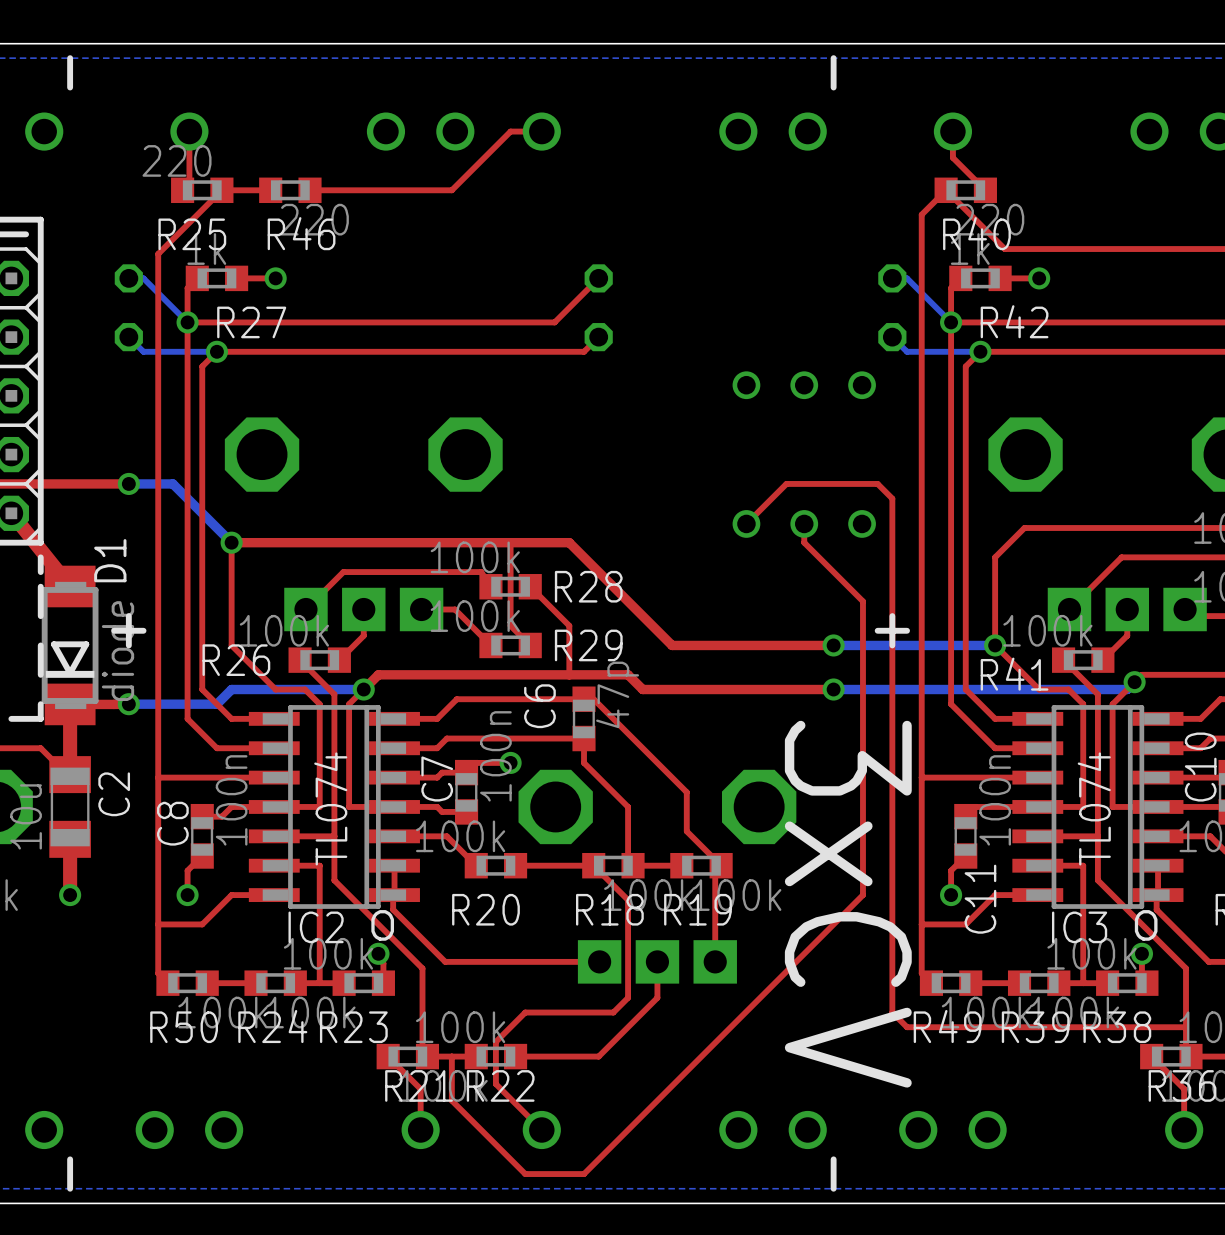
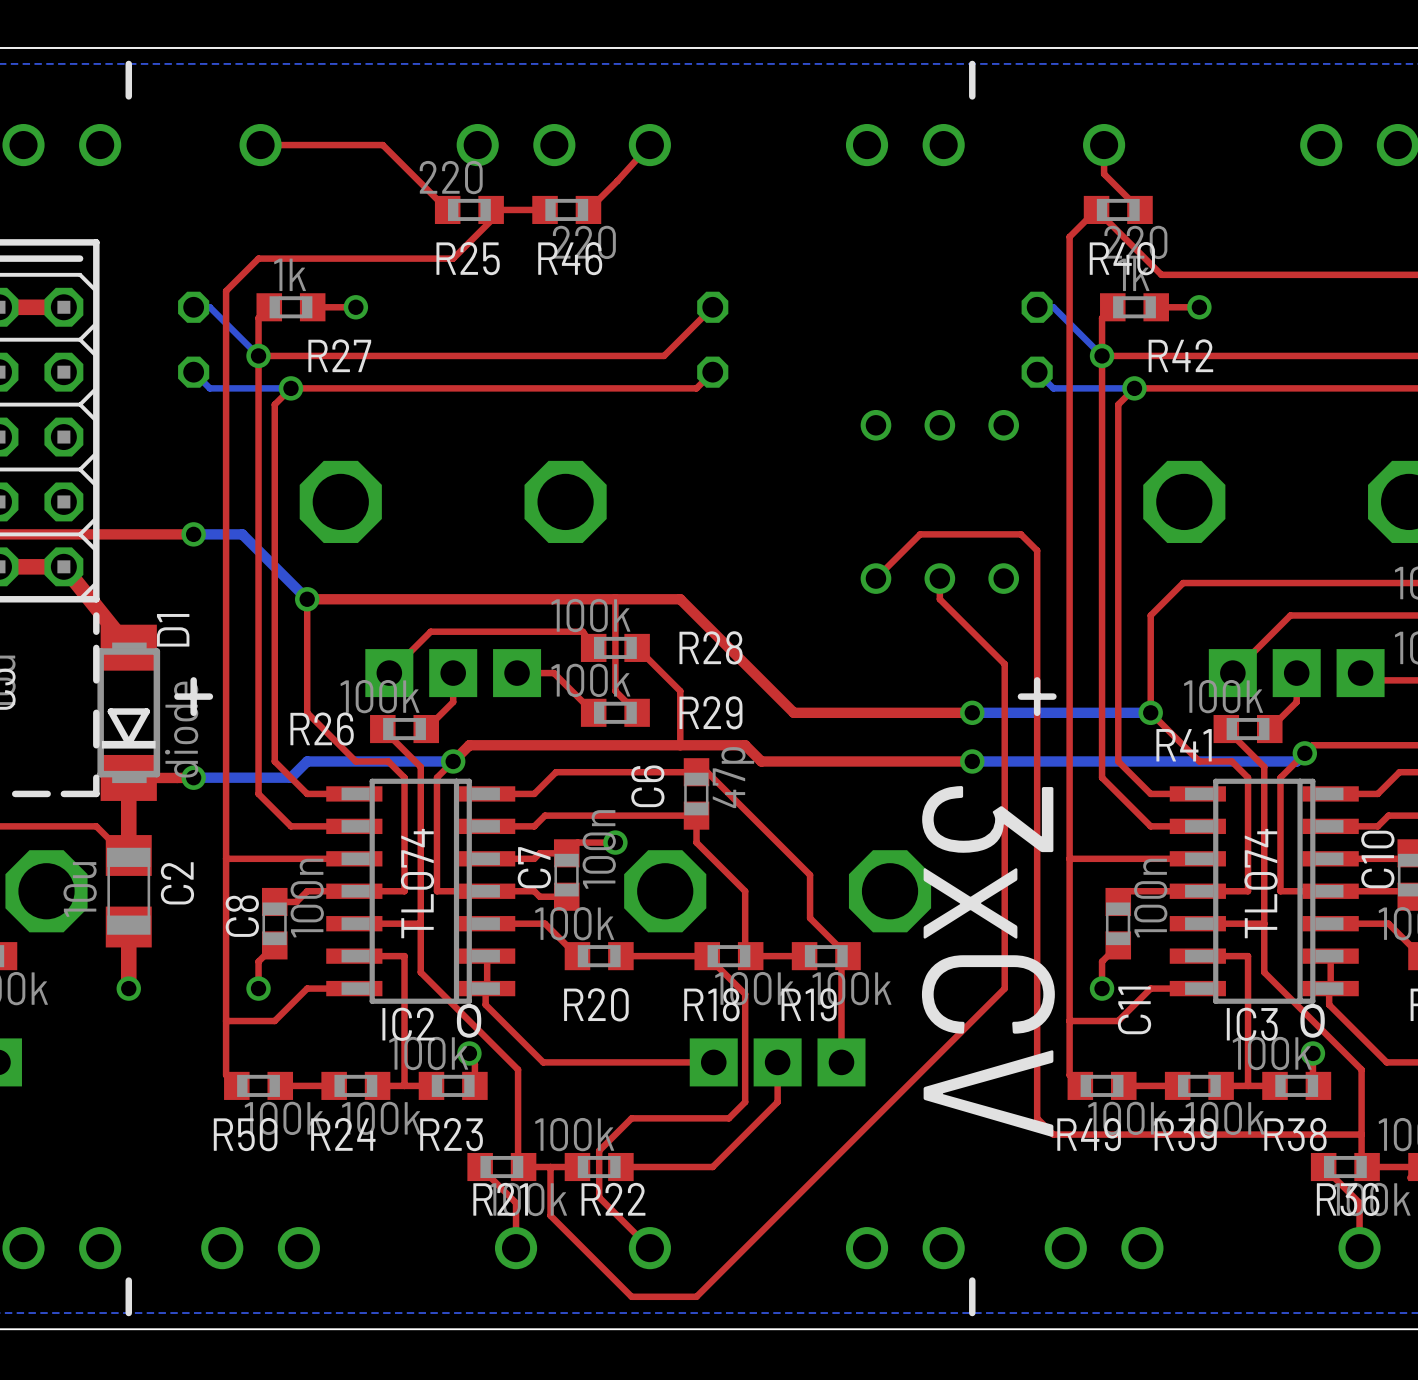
top track: (189, 131) (189, 183) (182, 190) -> (260, 145) (382, 145) (447, 209)
top track: (541, 131) (510, 131) (451, 190) (446, 190) -> (649, 145) (588, 209)
R25 position: (202, 190) -> (469, 209)
top track: (270, 190) (221, 190) (158, 253) (158, 263) -> (491, 209) (491, 220) (453, 258) (258, 258) (226, 291)
R46 position: (290, 190) -> (566, 209)
top track: (310, 190) (398, 190) -> none

